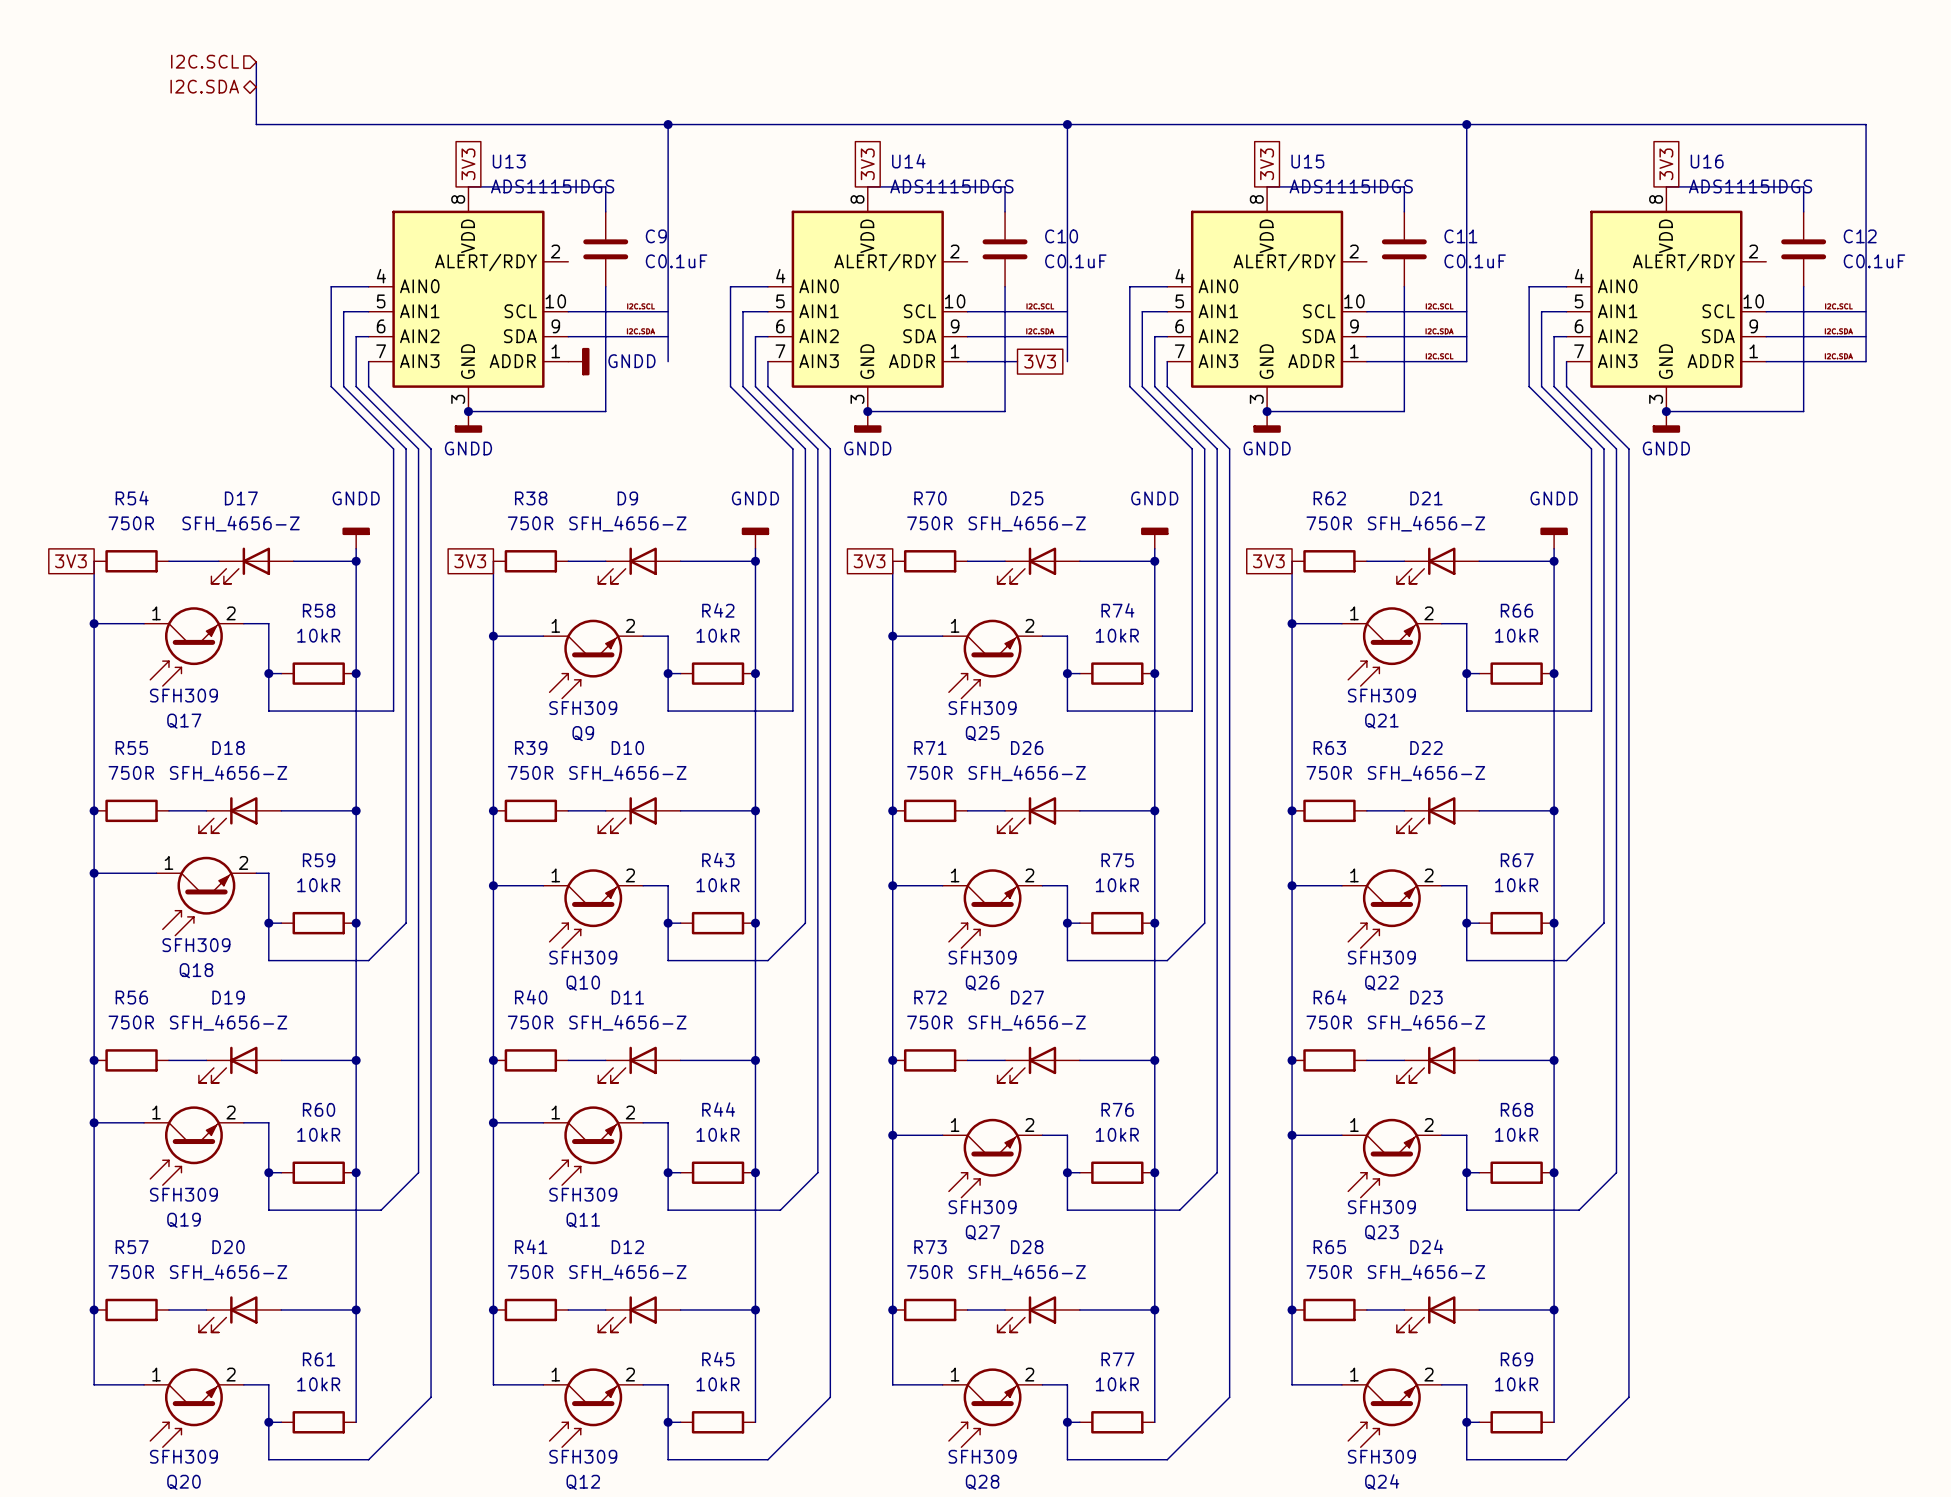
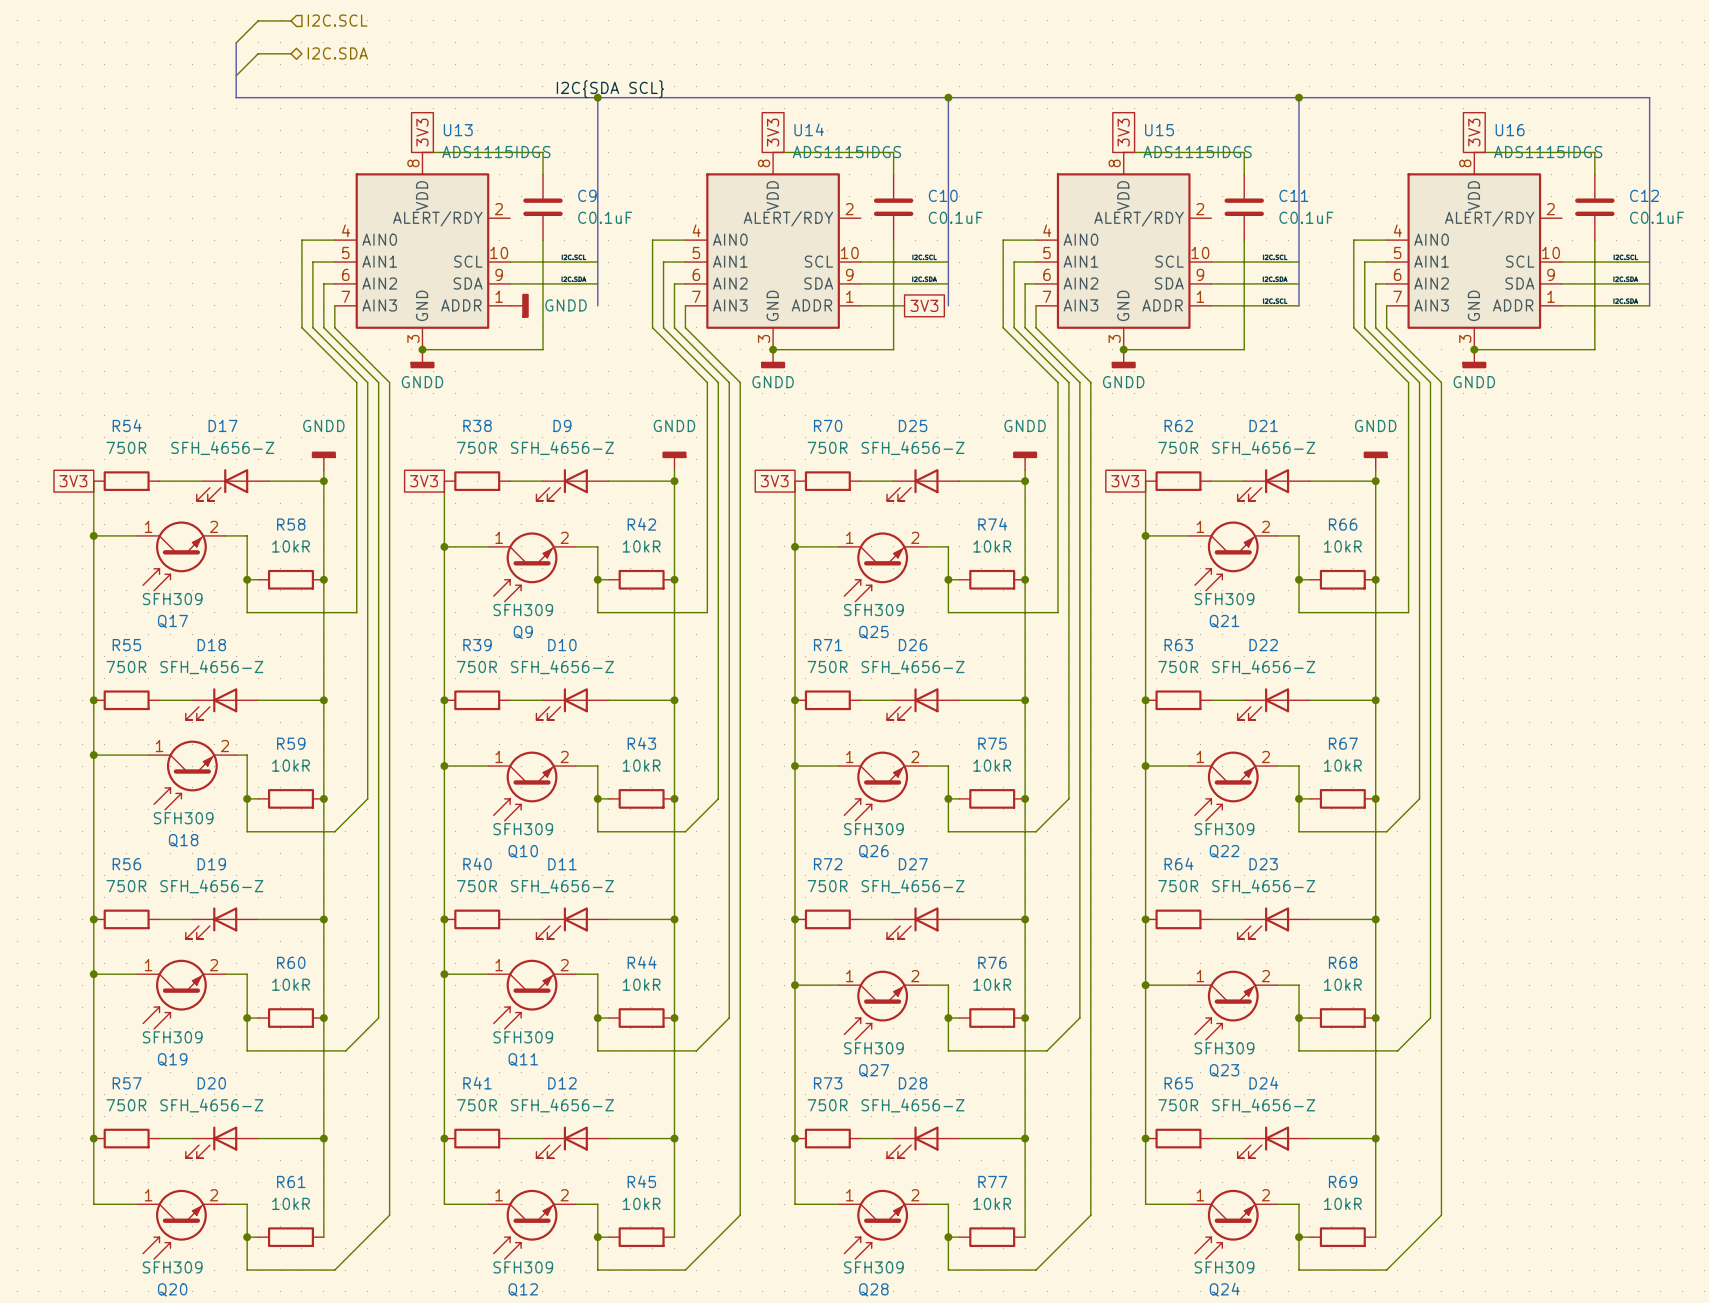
wire: none -> (290, 20) (258, 20) (236, 42)
hierarchical label rotation: 0° (205, 61) -> 180° (337, 20)
hierarchical label position: I2C.SCL (205, 61) -> I2C.SCL (337, 20)
wire: none -> (290, 53) (258, 53) (236, 75)
hierarchical label rotation: 0° (204, 86) -> 180° (337, 53)
hierarchical label position: I2C.SDA (204, 86) -> I2C.SDA (337, 53)
label: none -> I2C{SDA SCL} (610, 89)

